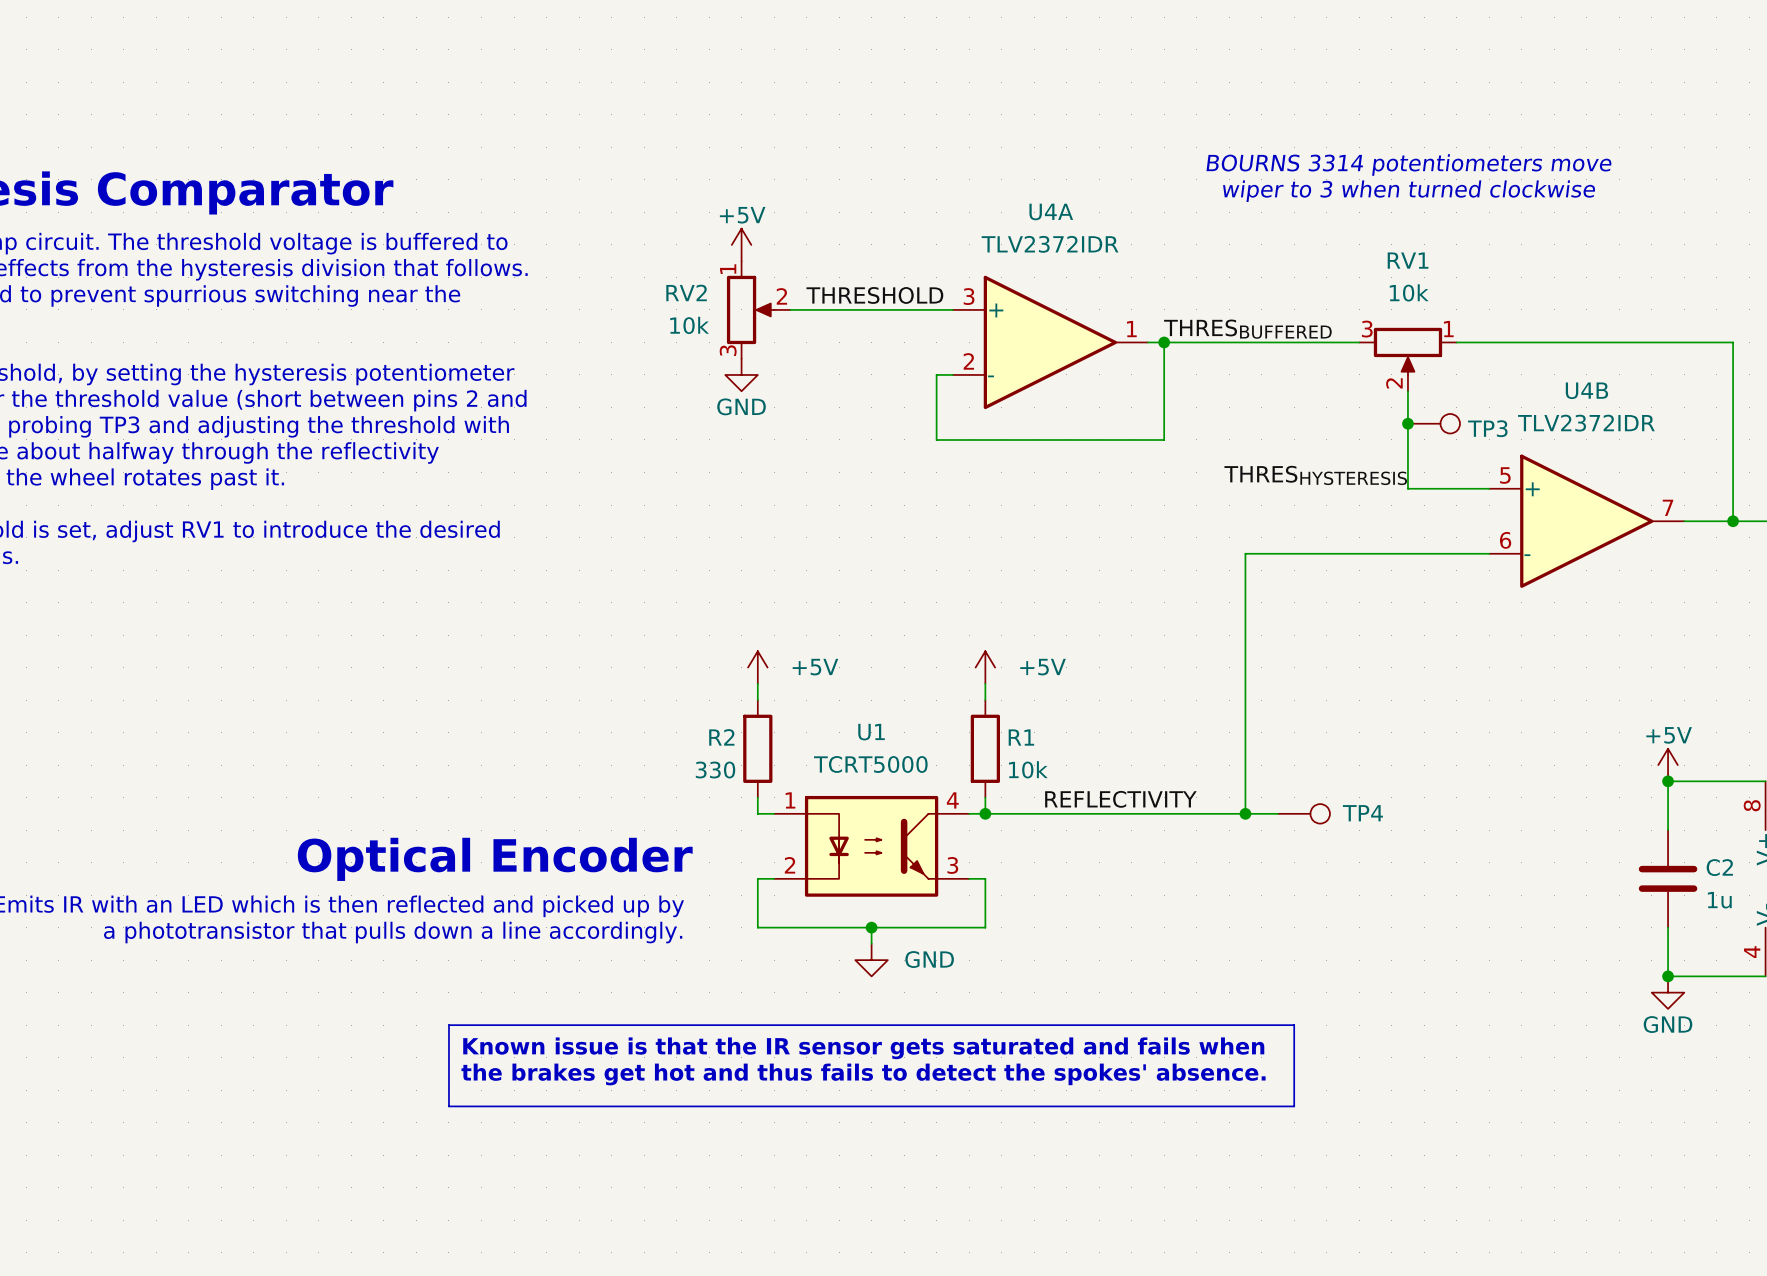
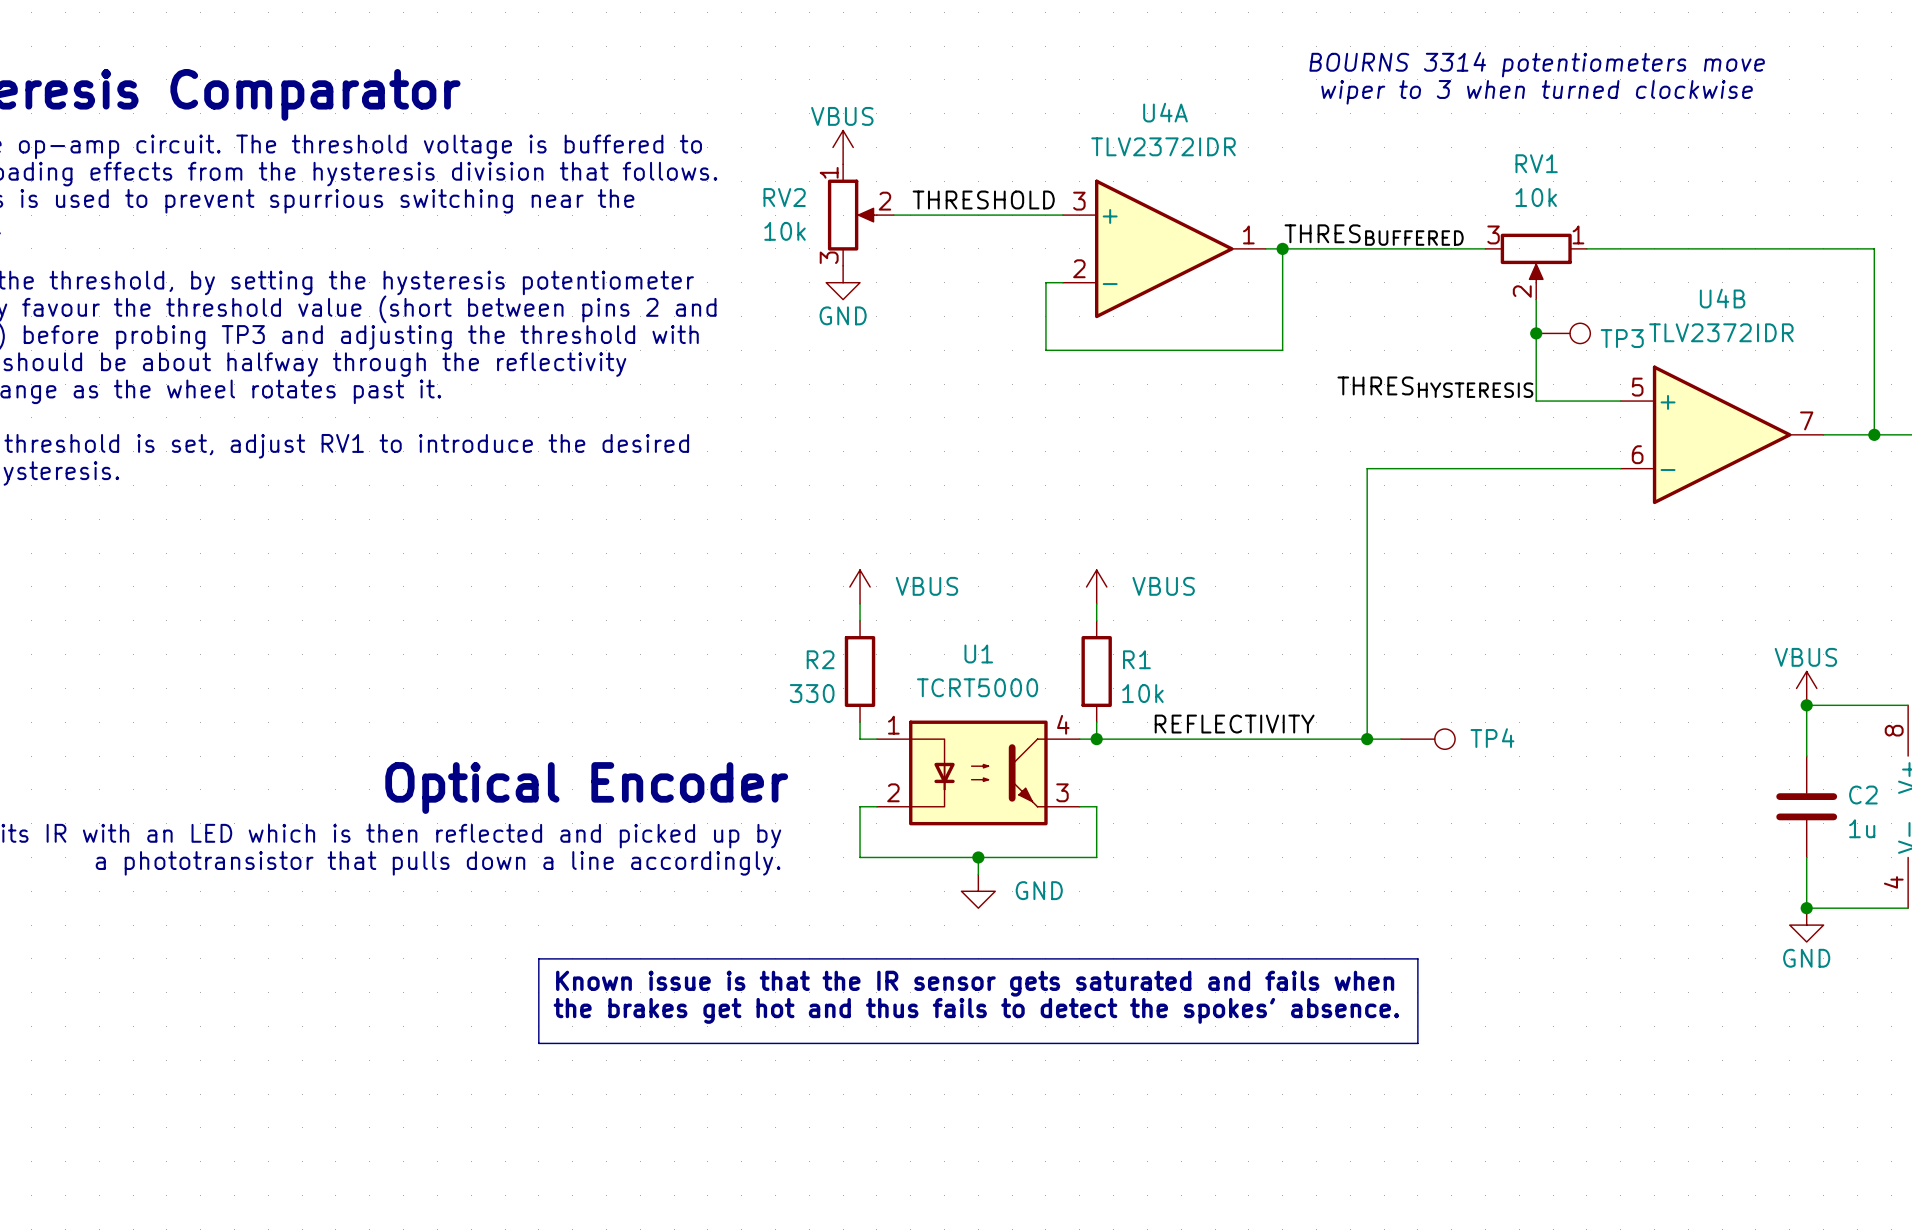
power symbol: +5V (741, 244) -> VBUS (843, 147)
power symbol: +5V (757, 667) -> VBUS (860, 586)
power symbol: +5V (985, 667) -> VBUS (1096, 586)
power symbol: +5V (1668, 765) -> VBUS (1806, 688)

